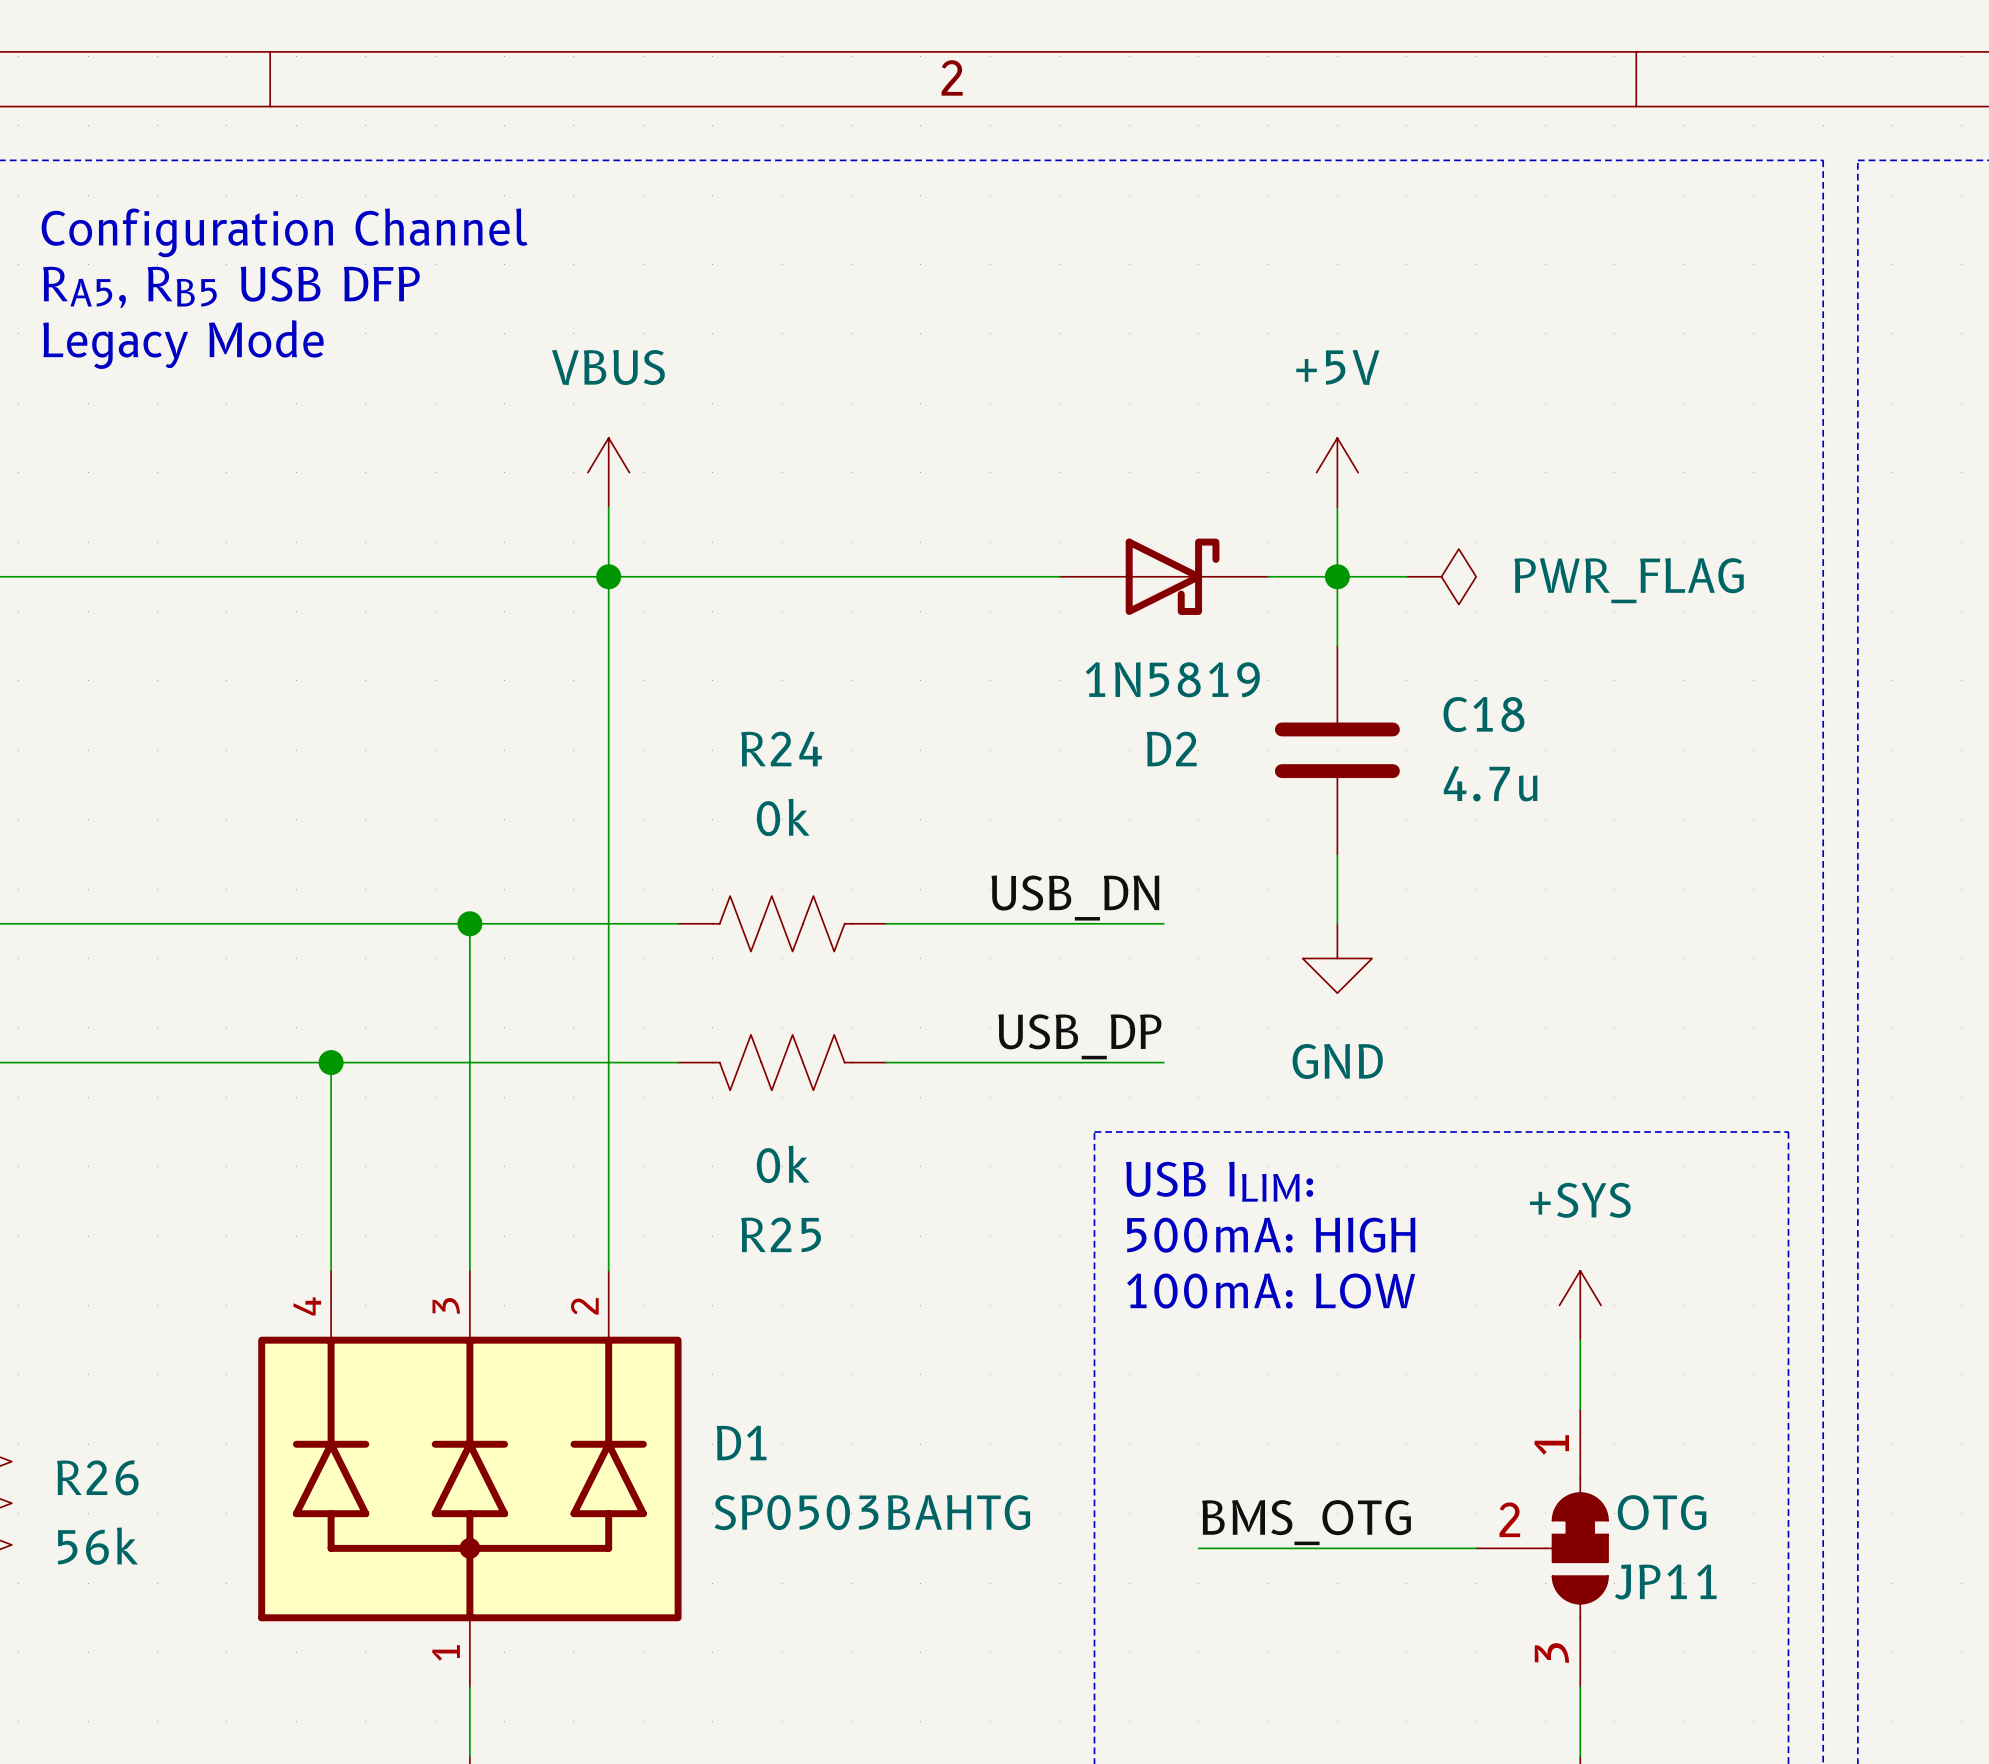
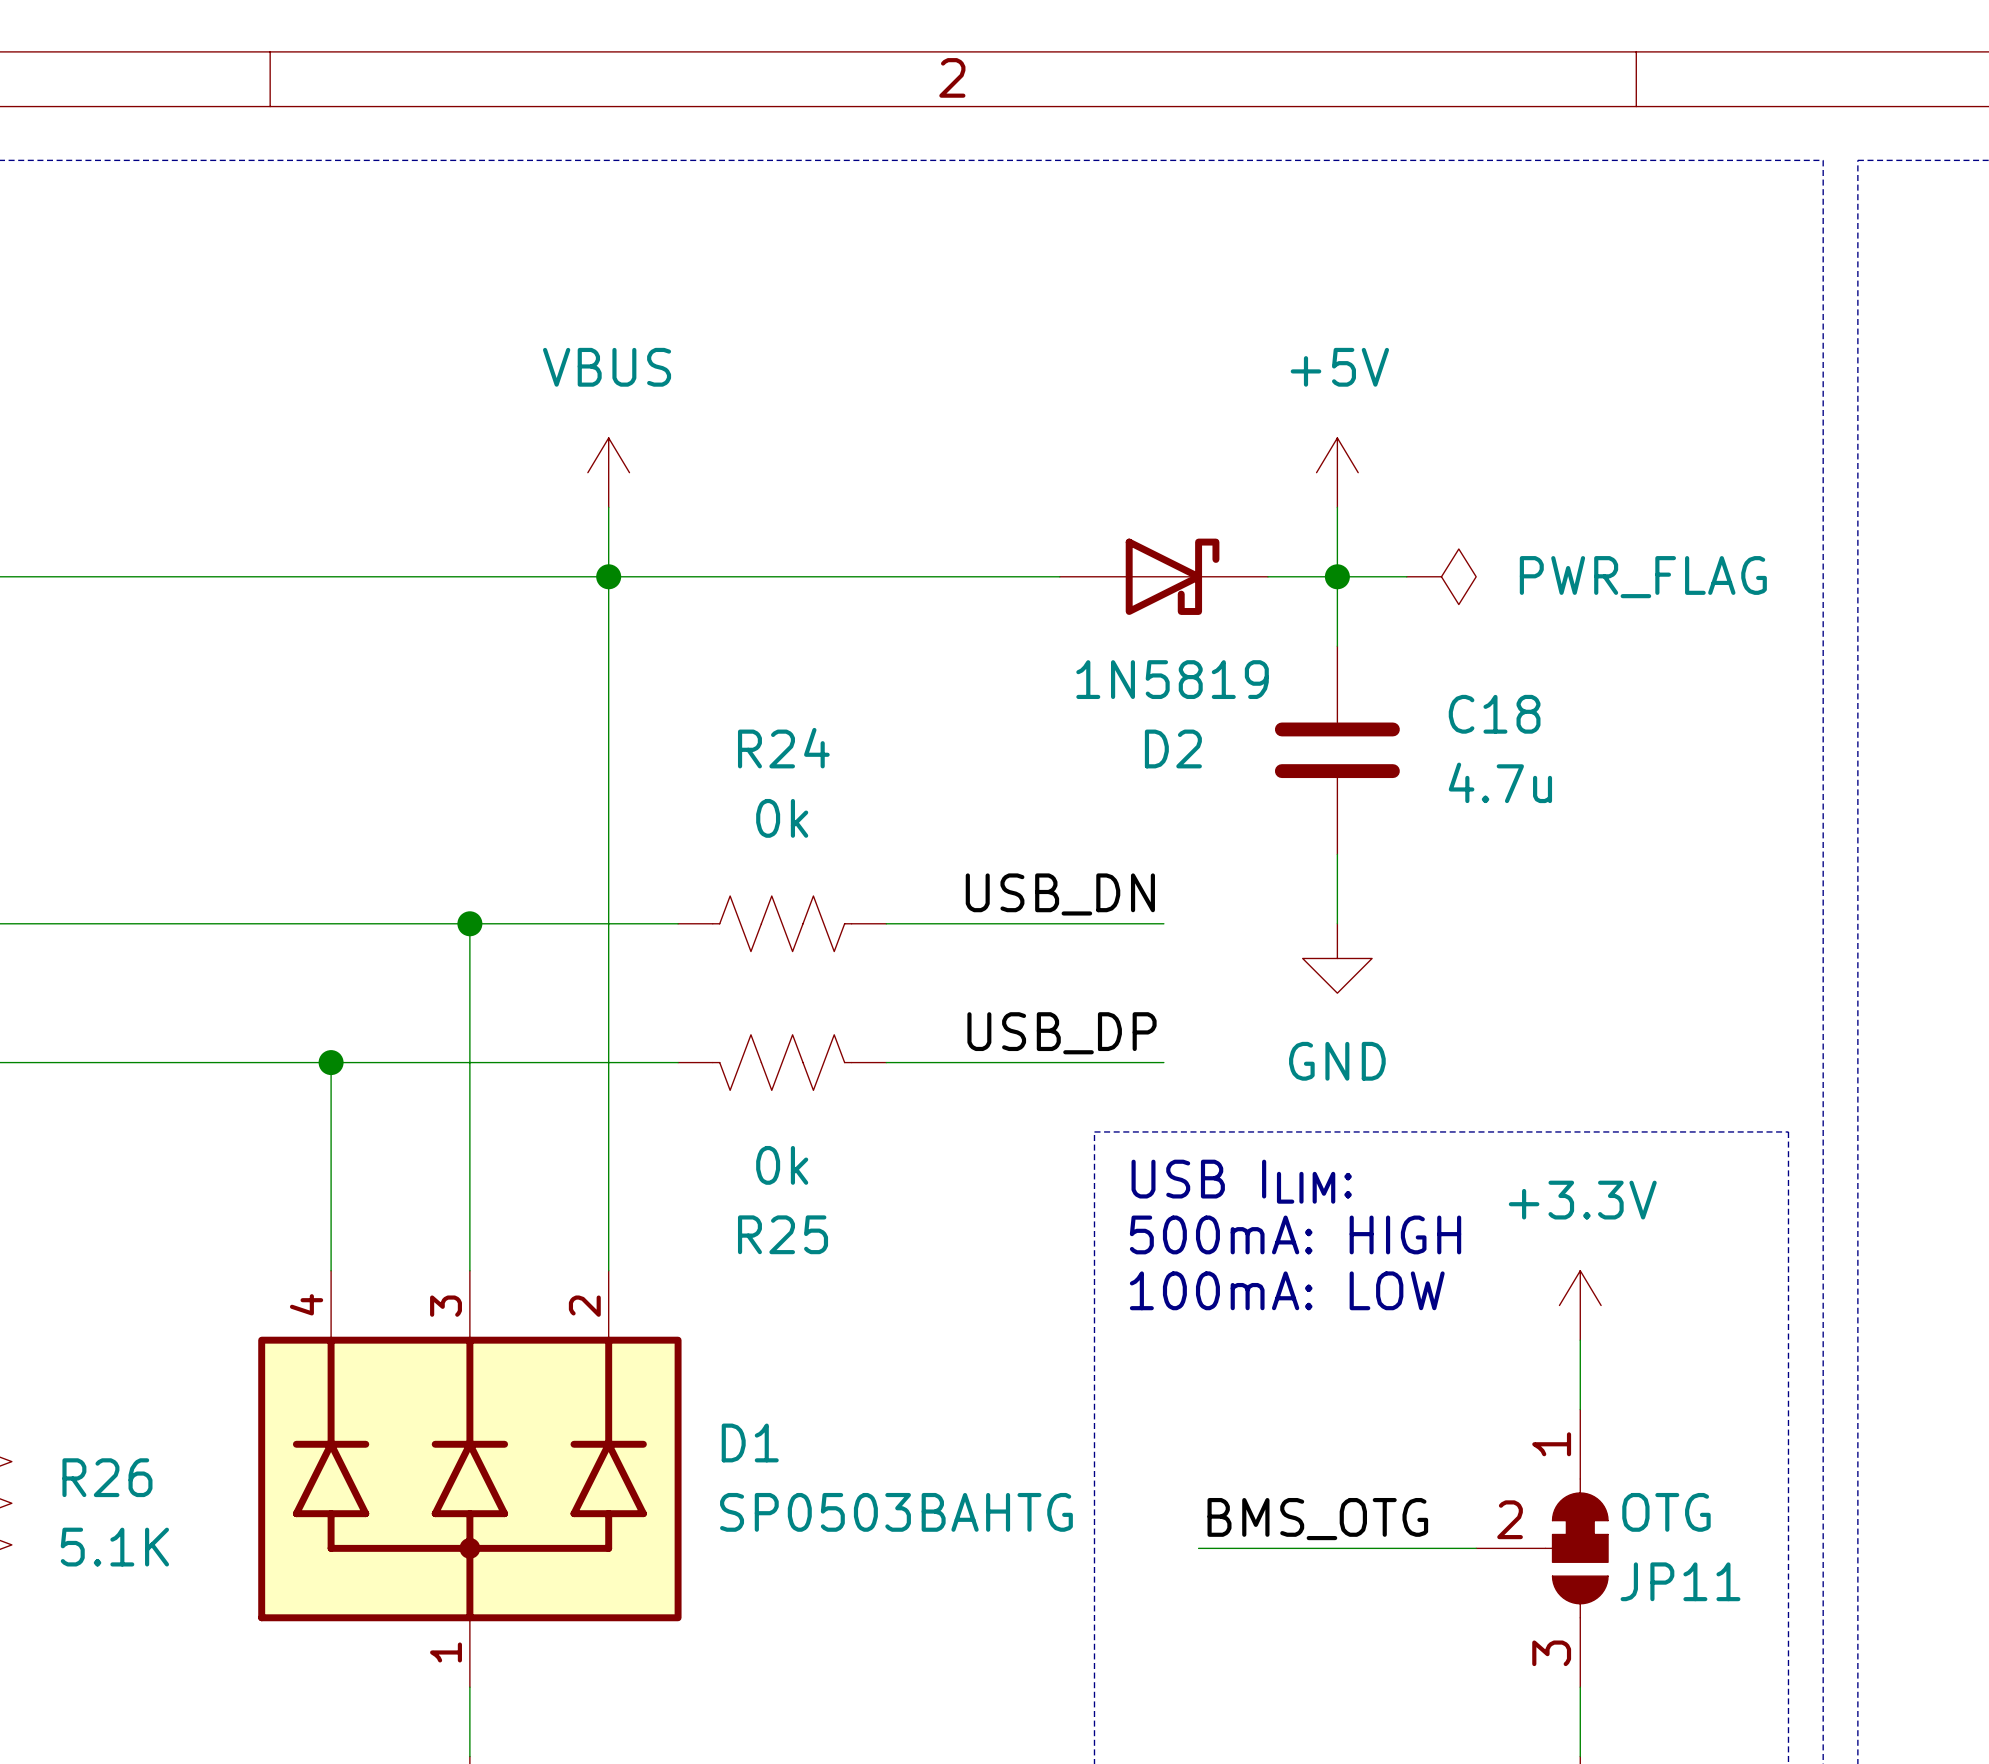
text: Configuration Channel (284, 232) -> none
text: RA5, RB5 USB DFP (231, 287) -> none
text: Legacy Mode (183, 344) -> none
power symbol: +SYS (1580, 1305) -> +3.3V (1580, 1305)
R26 value: 56k (98, 1546) -> 5.1K (114, 1547)

